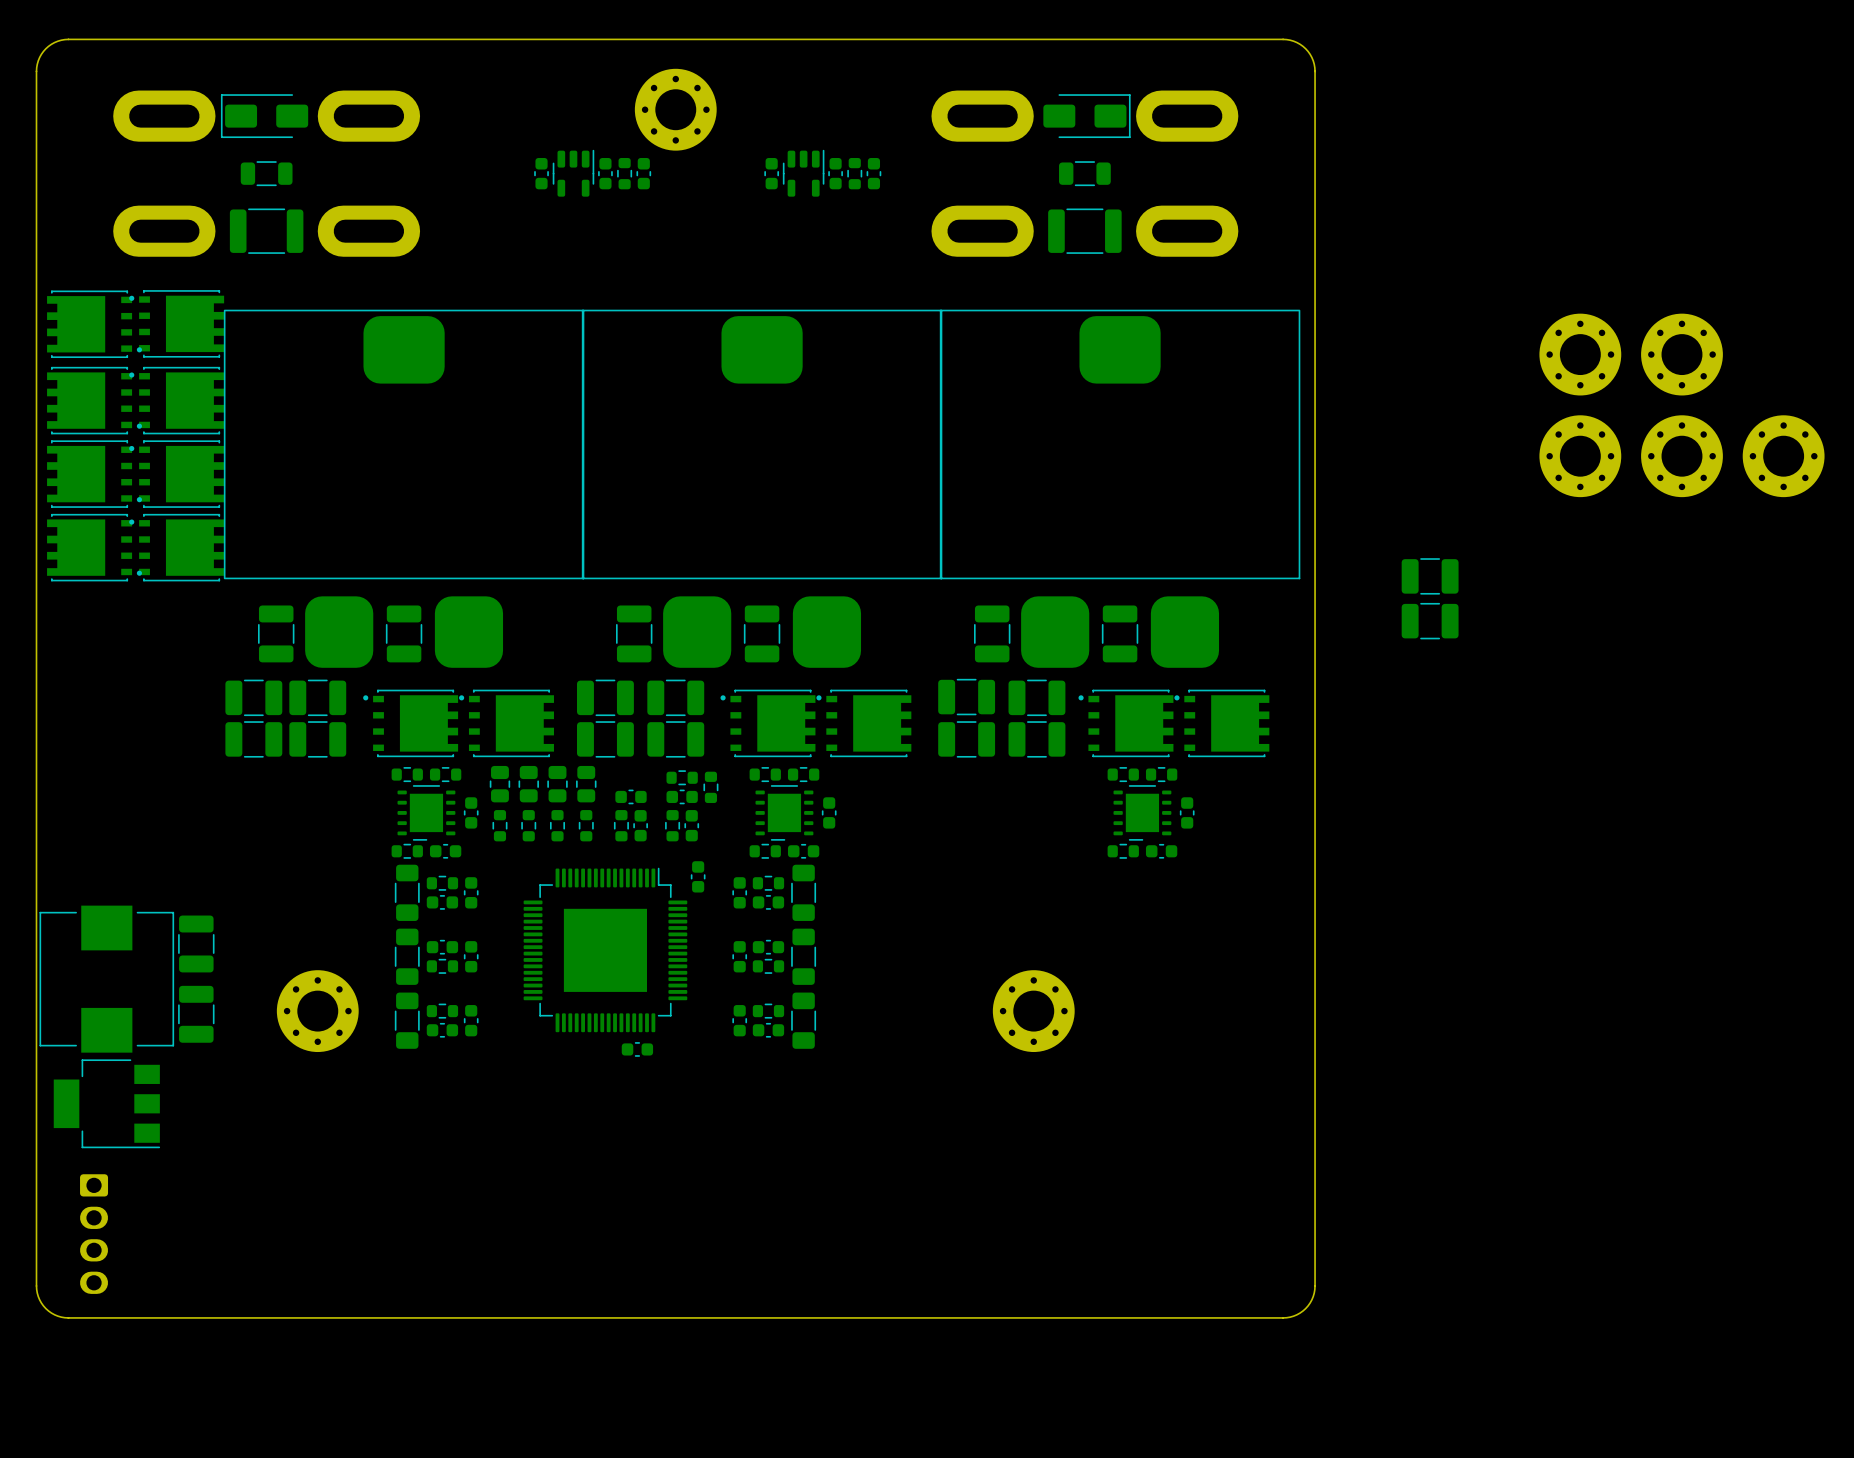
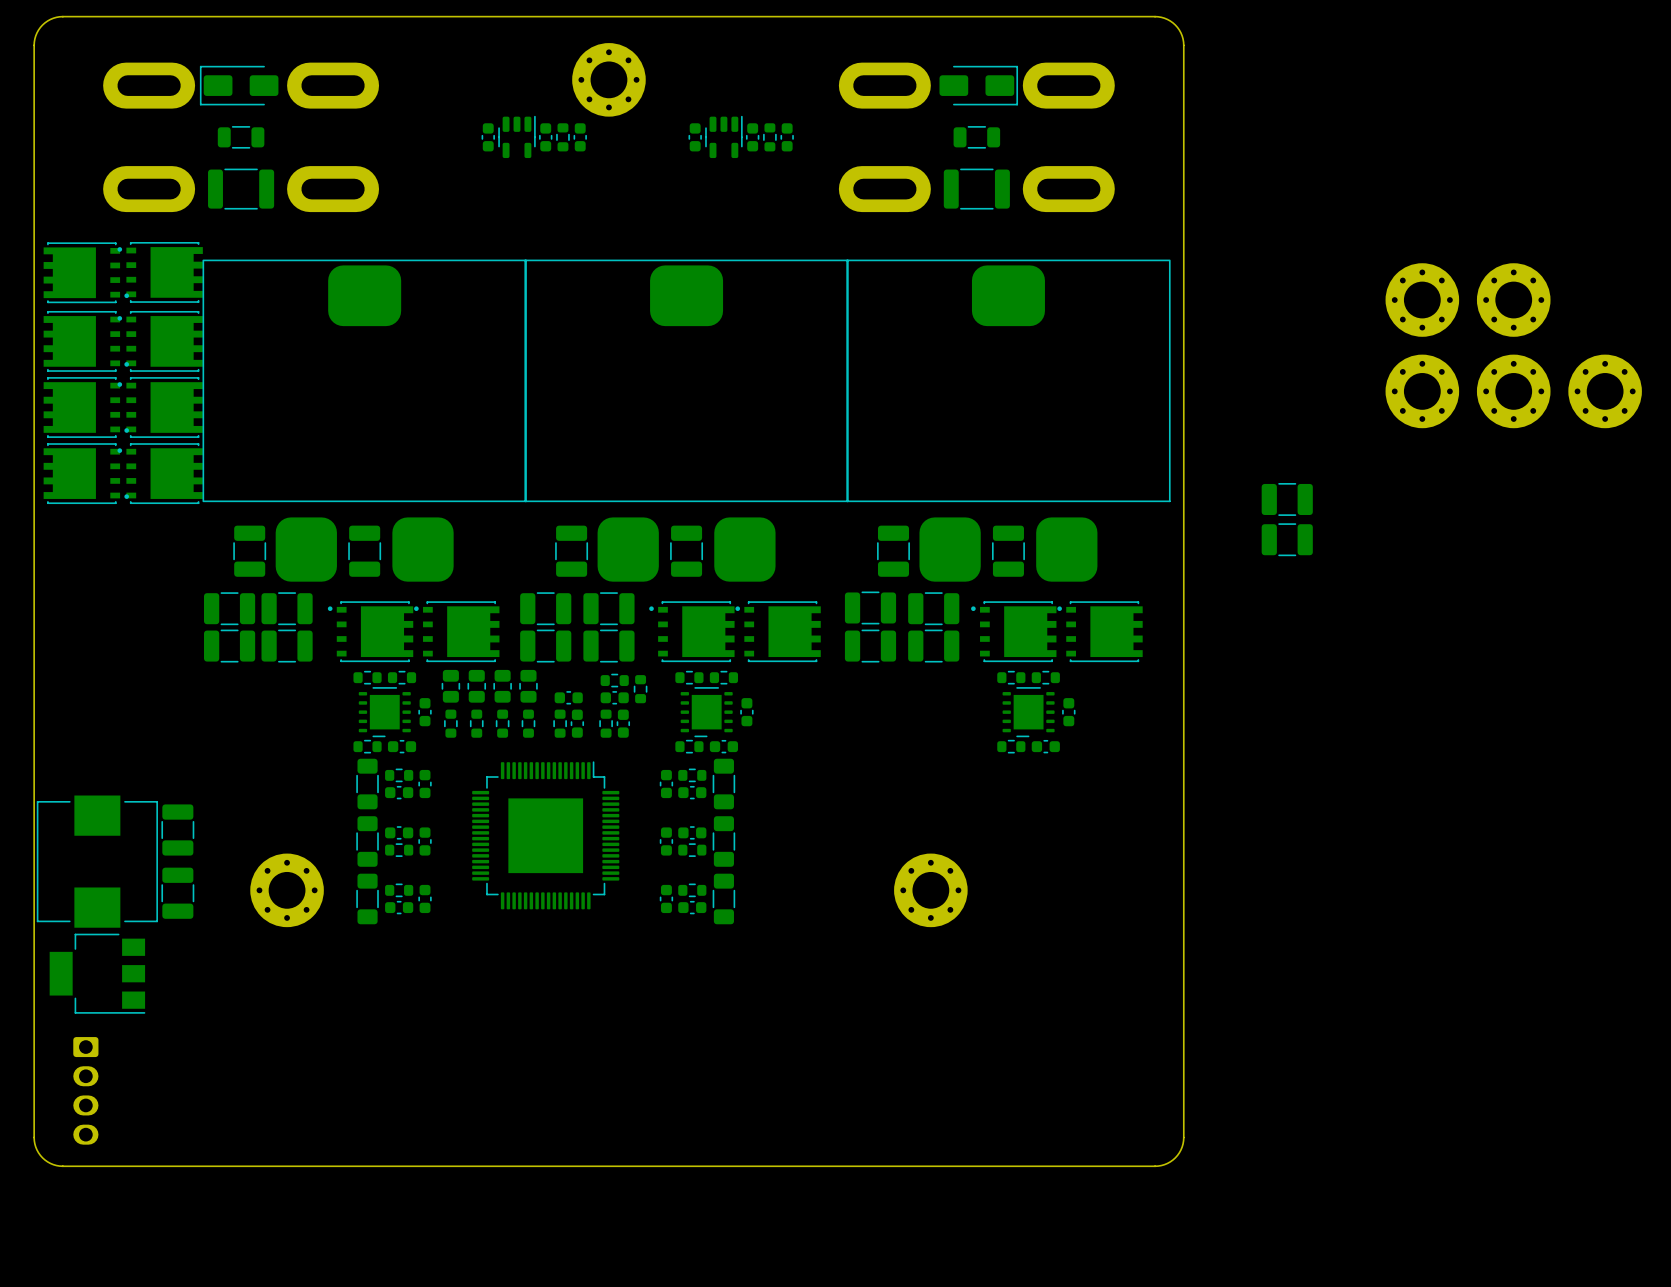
part: (698, 876) -> none
part: (637, 1049) -> none

